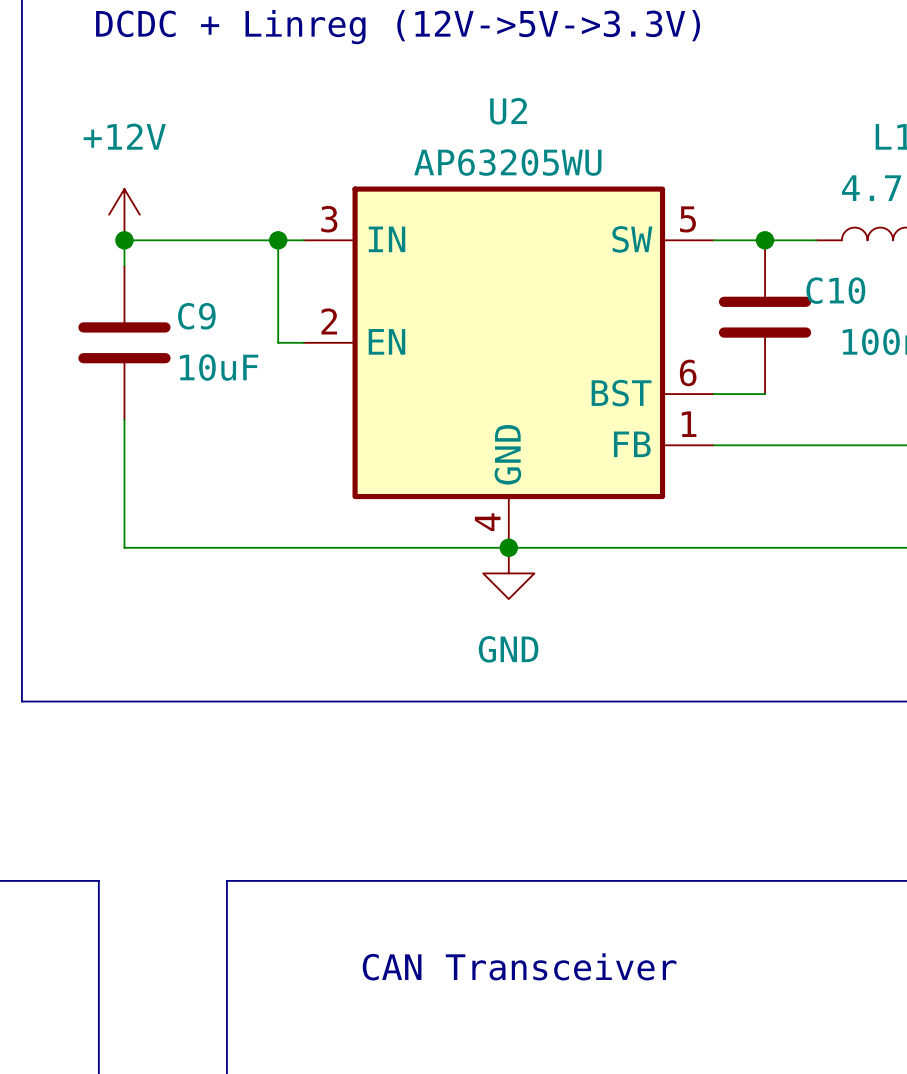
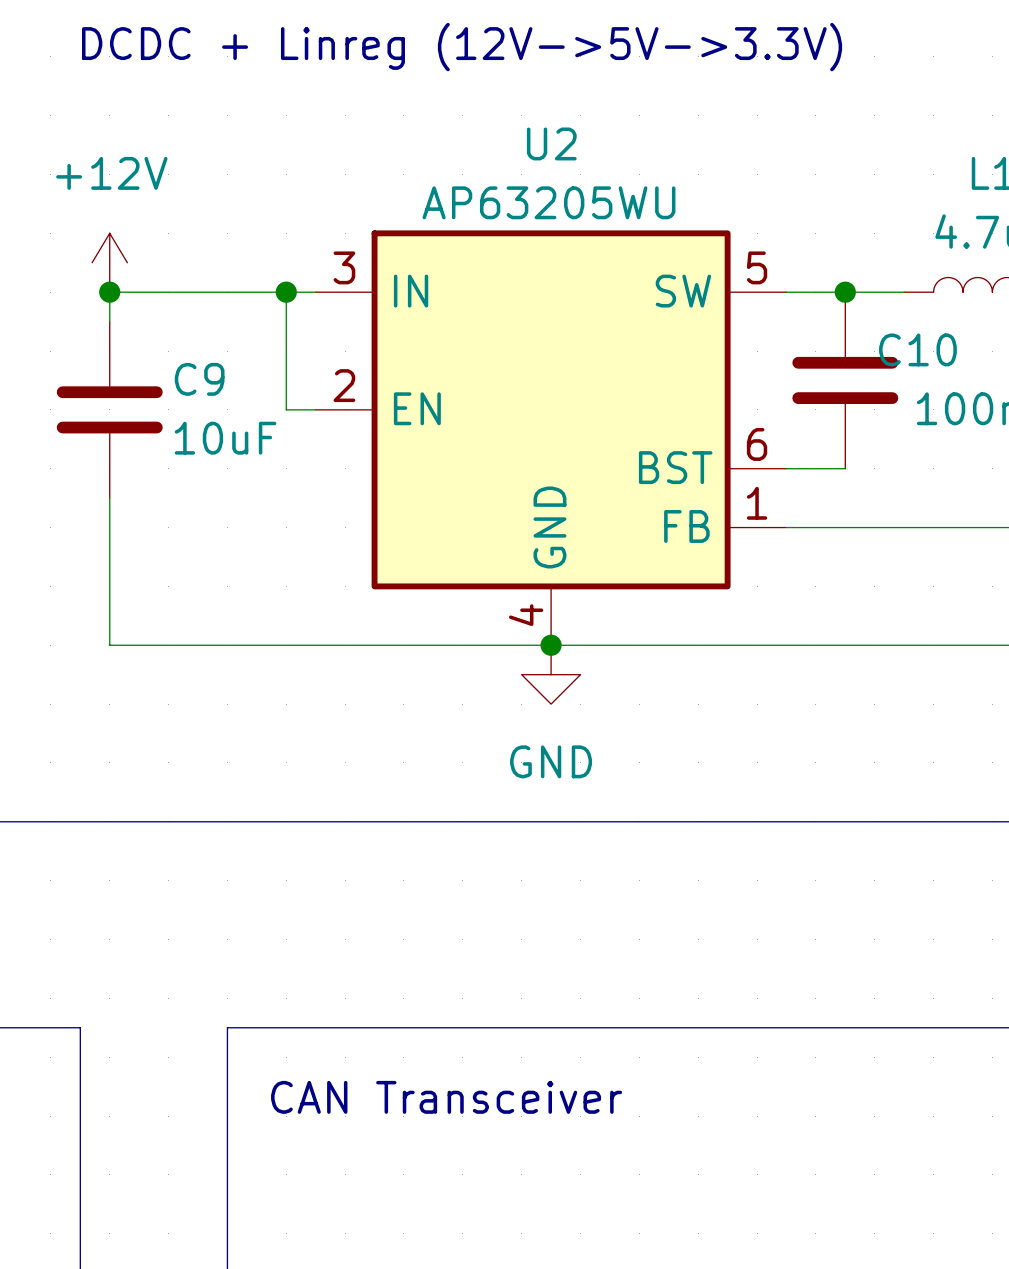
text position: CAN Transceiver (519, 966) -> CAN Transceiver (446, 1097)

